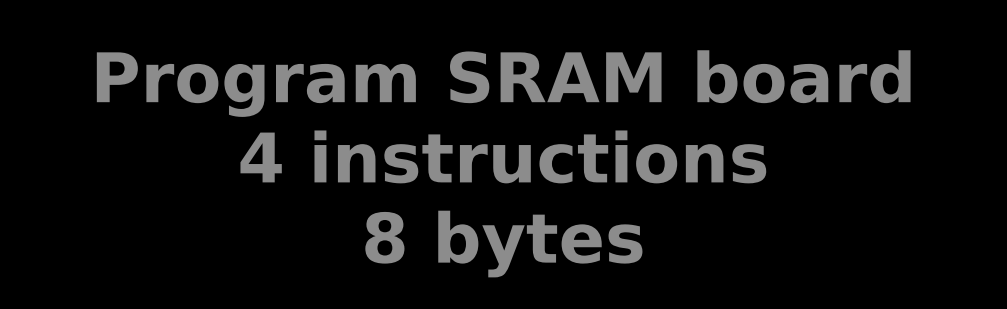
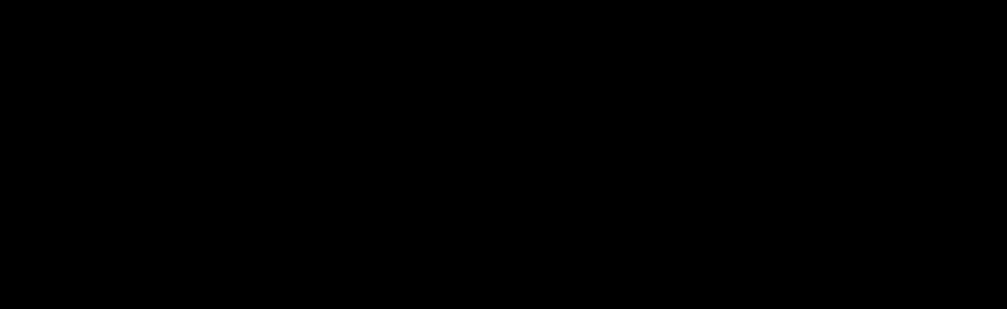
text: Program SRAM board (503, 83) -> none
text: 4 instructions (503, 156) -> none
text: 8 bytes (503, 244) -> none

